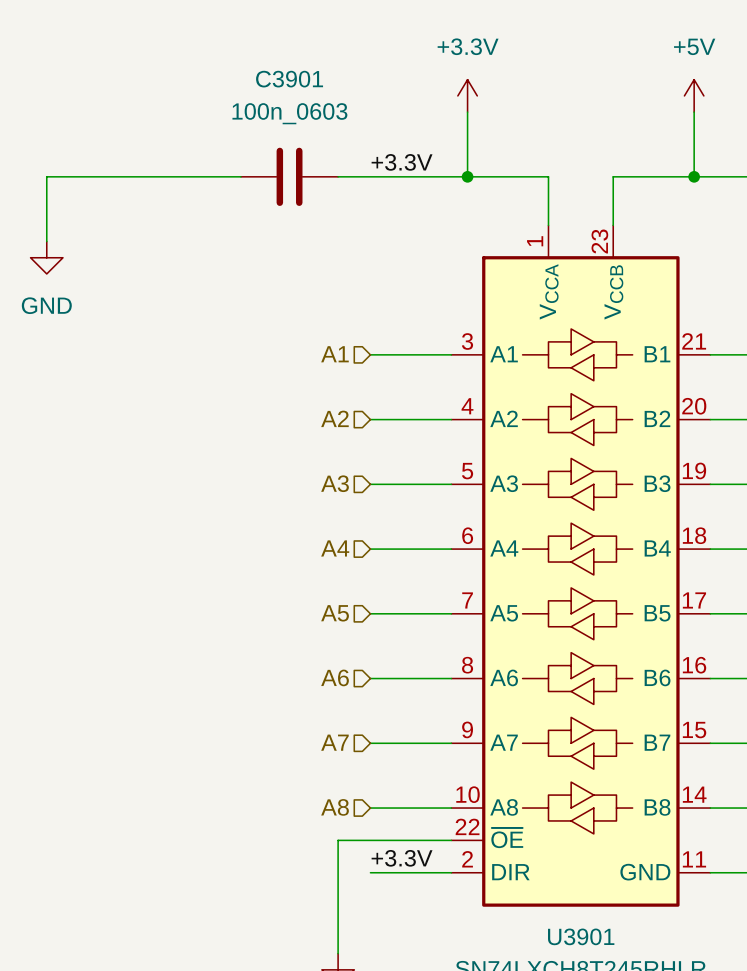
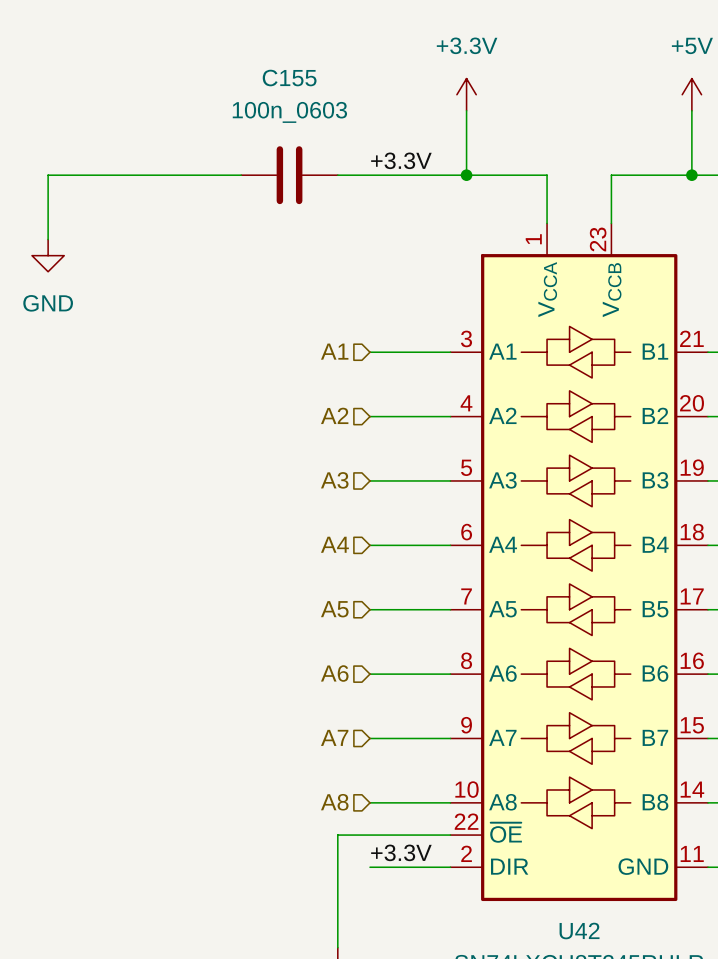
C3901 name: C3901 (289, 79) -> C155 (289, 78)
U3901 name: U3901 (581, 936) -> U42 (579, 931)

